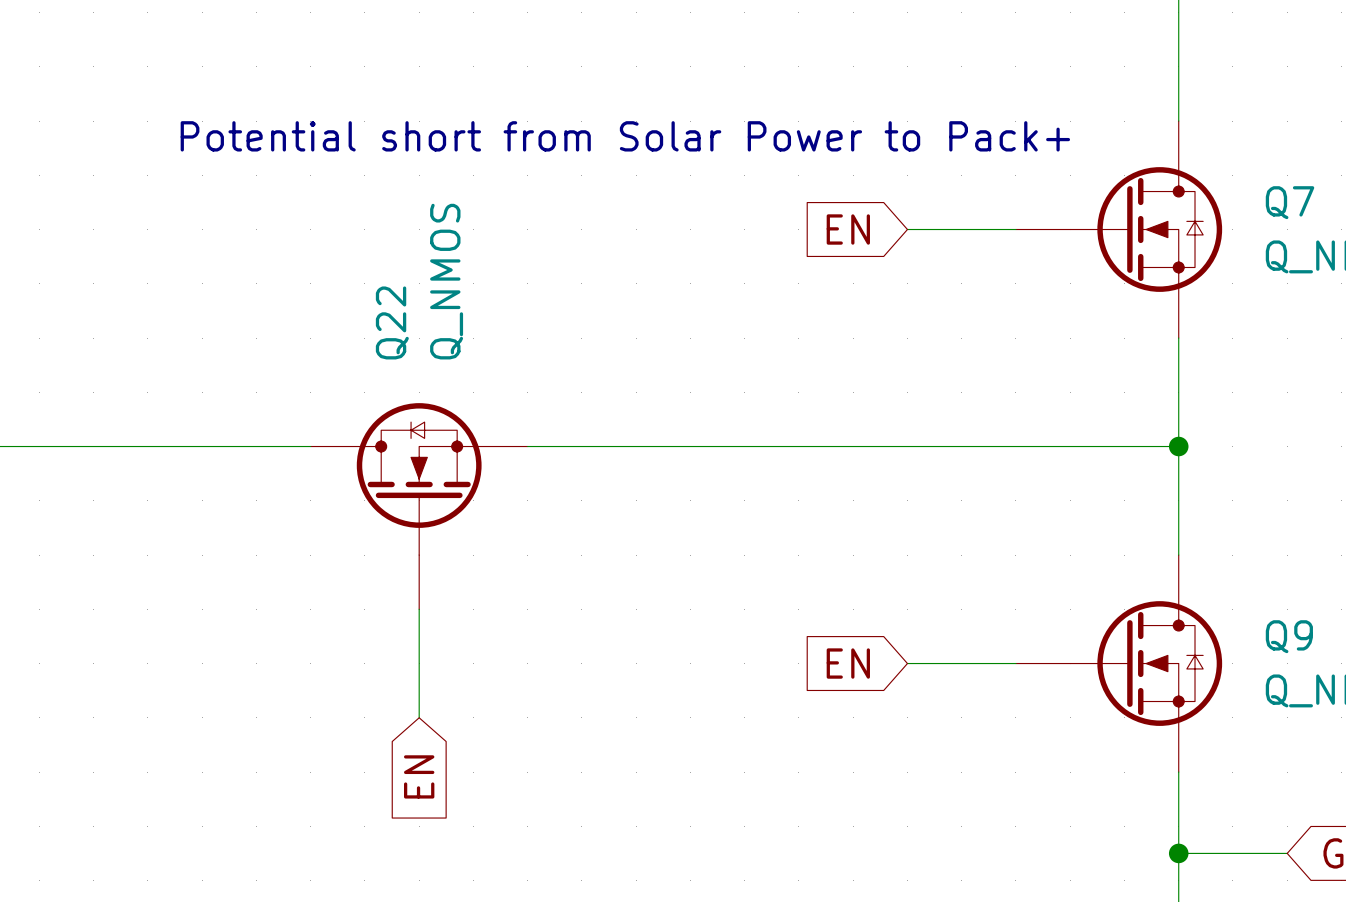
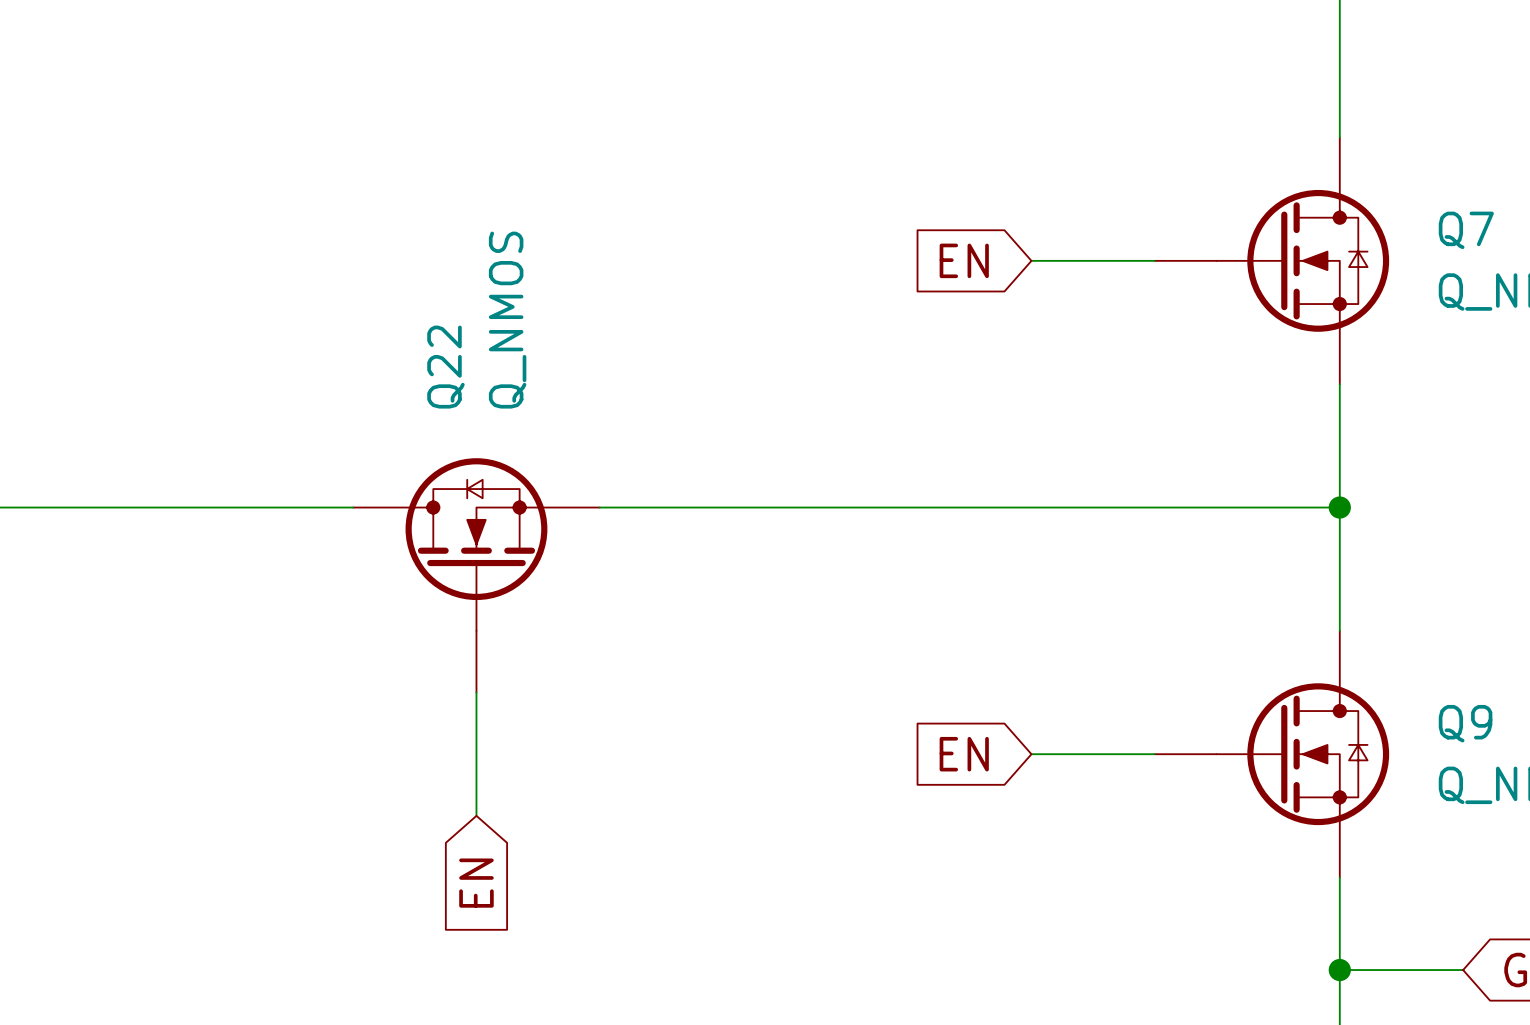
text: Potential short from Solar Power to Pack+ (625, 136) -> none

